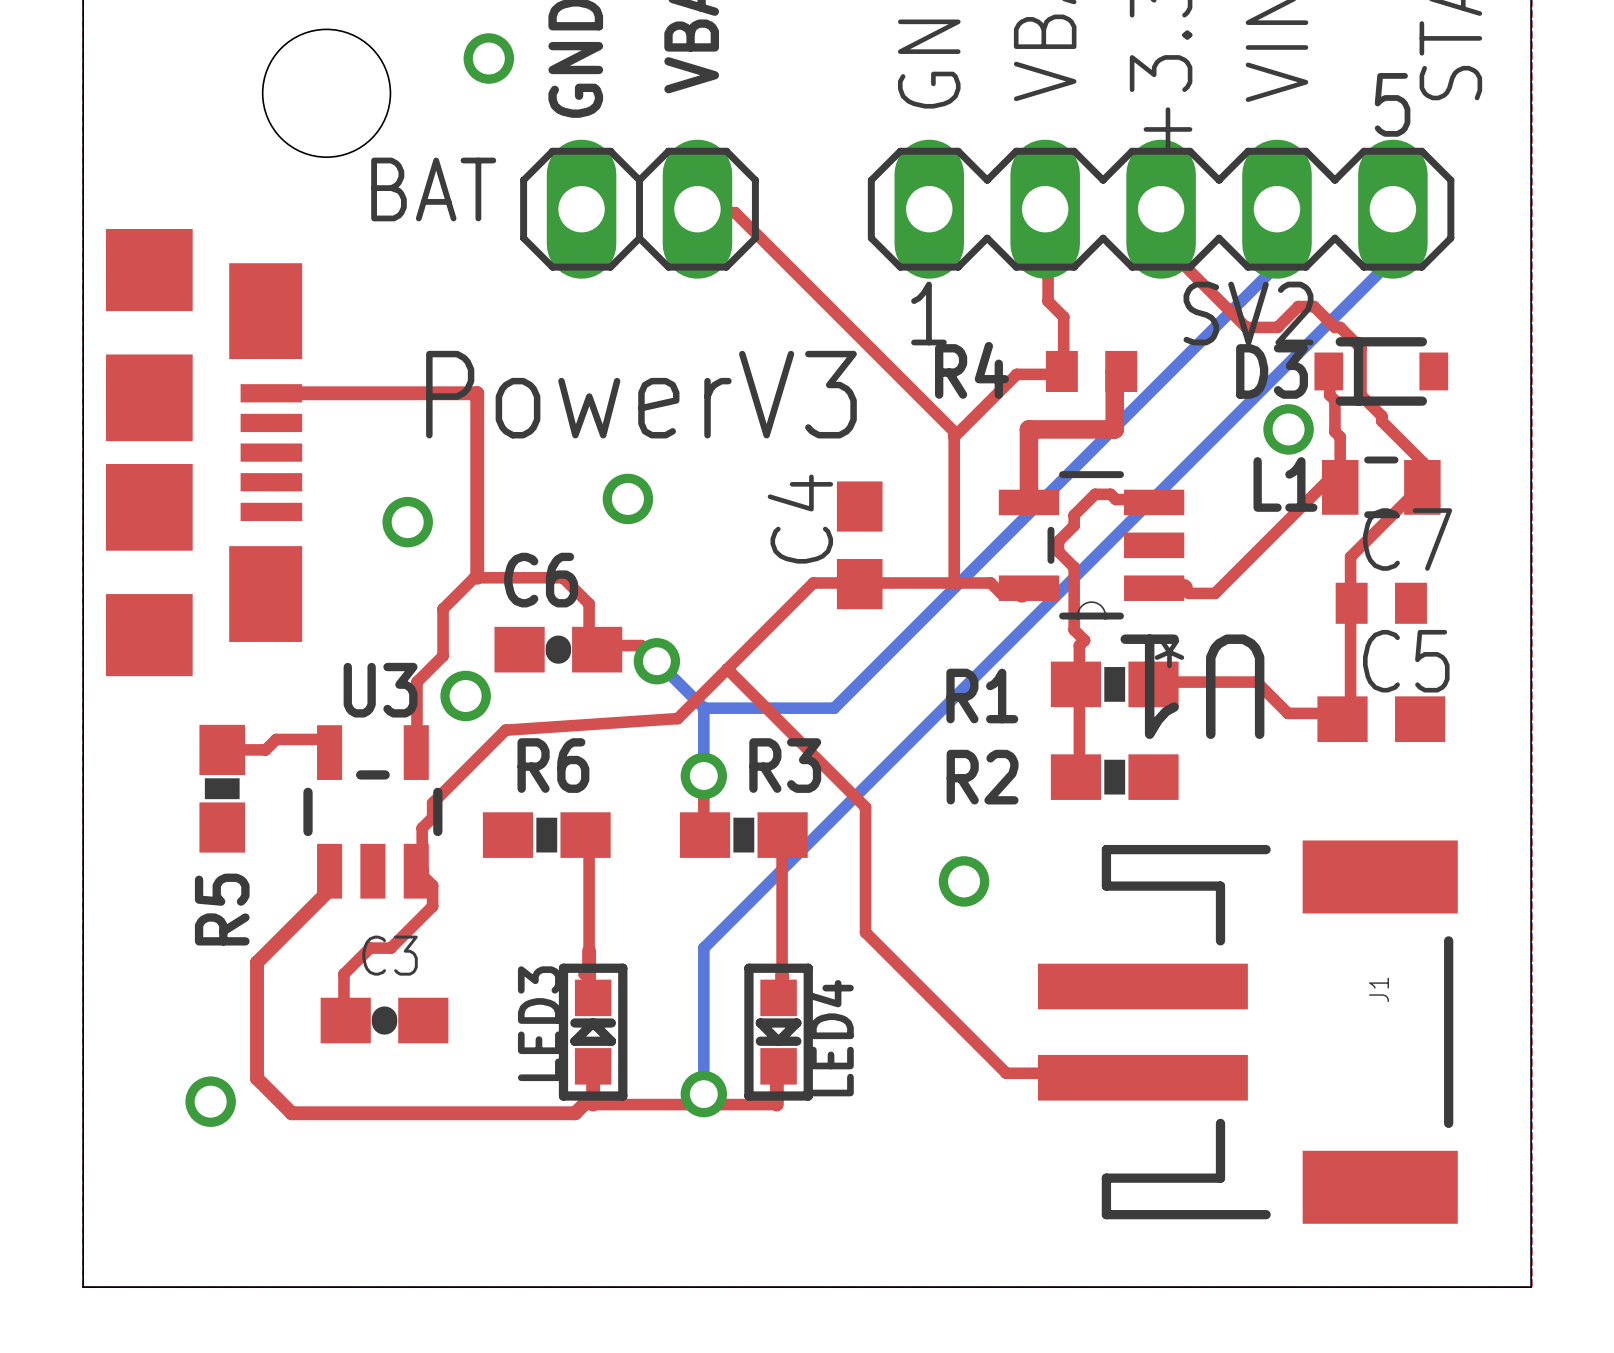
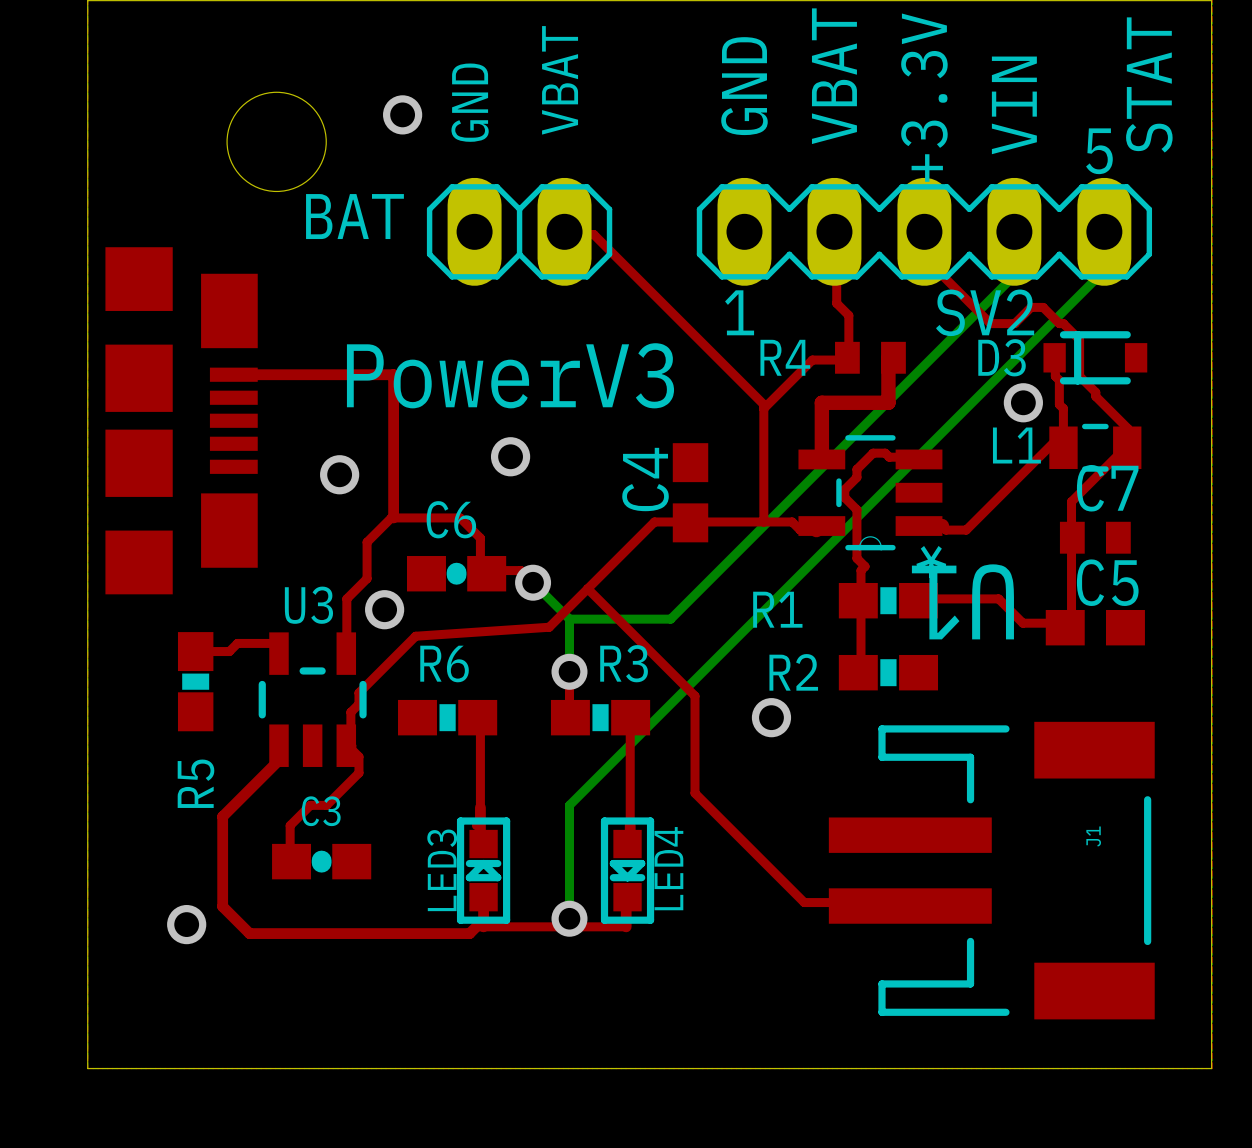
via position: (964, 881) -> (771, 717)

